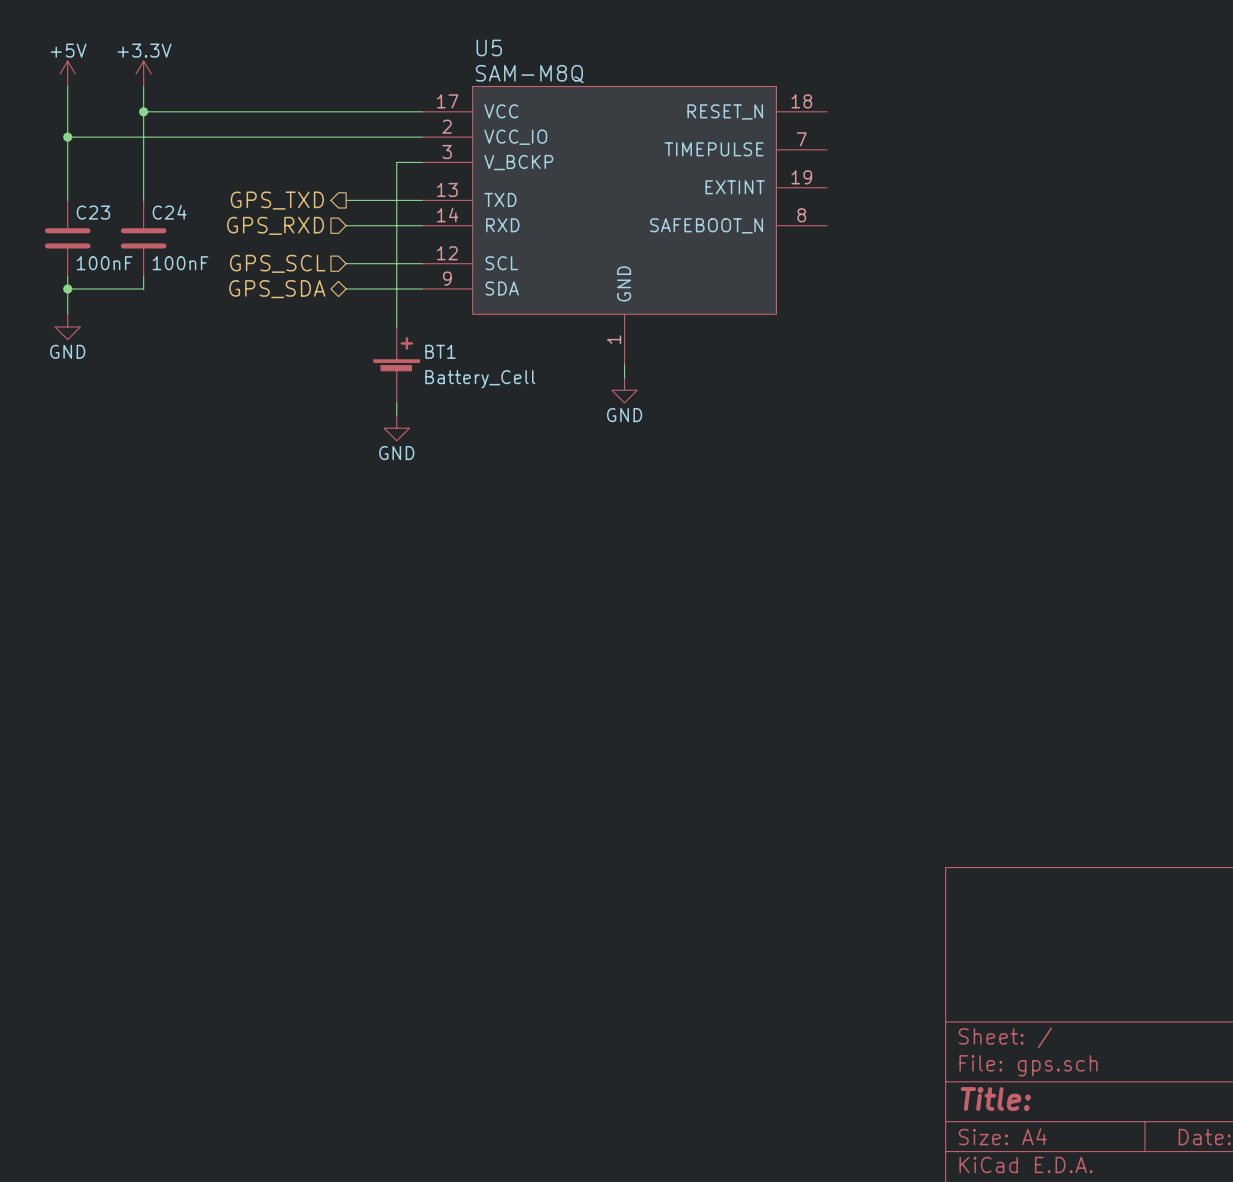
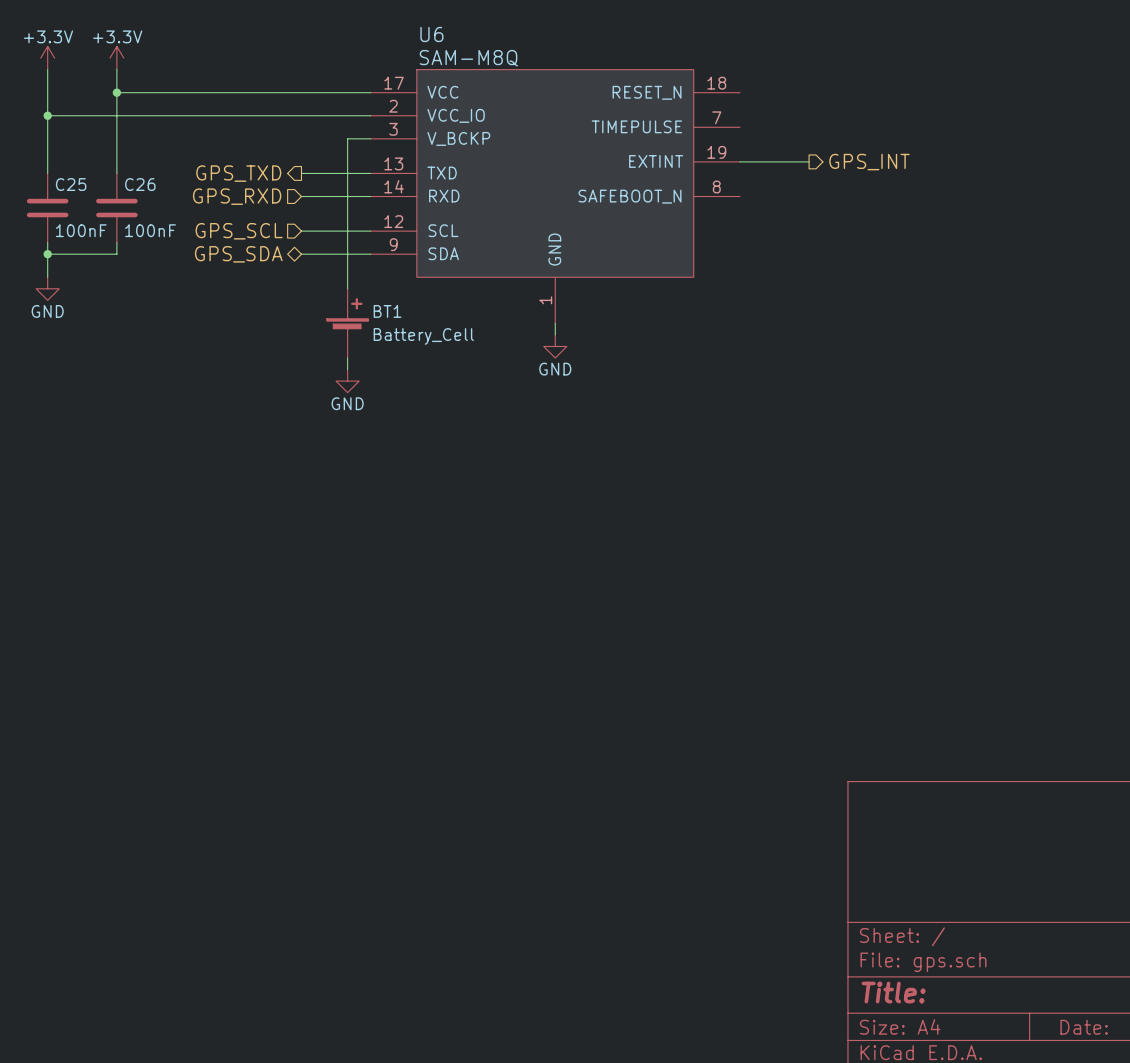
U5 name: U5 (489, 47) -> U6 (431, 34)
power symbol: +5V (67, 73) -> +3.3V (47, 58)
wire: none -> (739, 161) (809, 161)
hierarchical label: none -> GPS_INT (869, 162)
C23 name: C23 (93, 212) -> C25 (71, 184)
C24 name: C24 (169, 212) -> C26 (140, 184)

